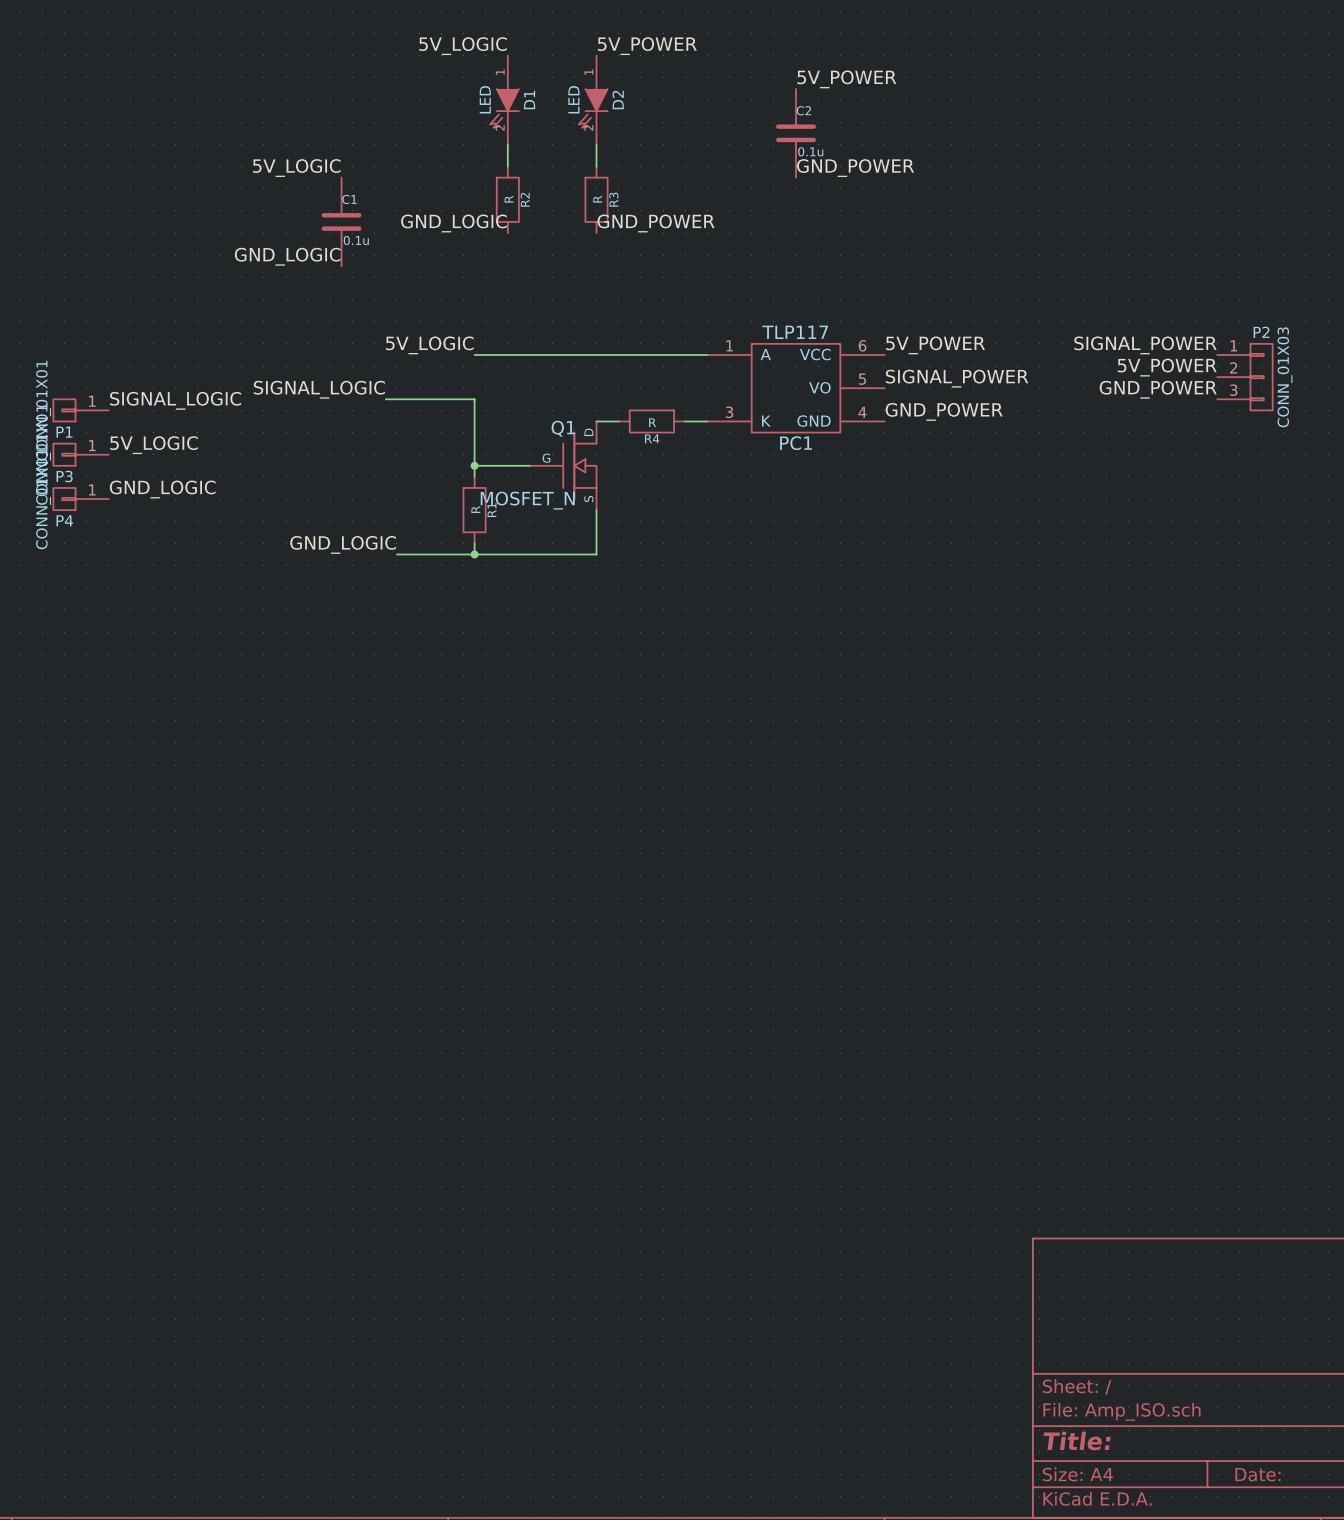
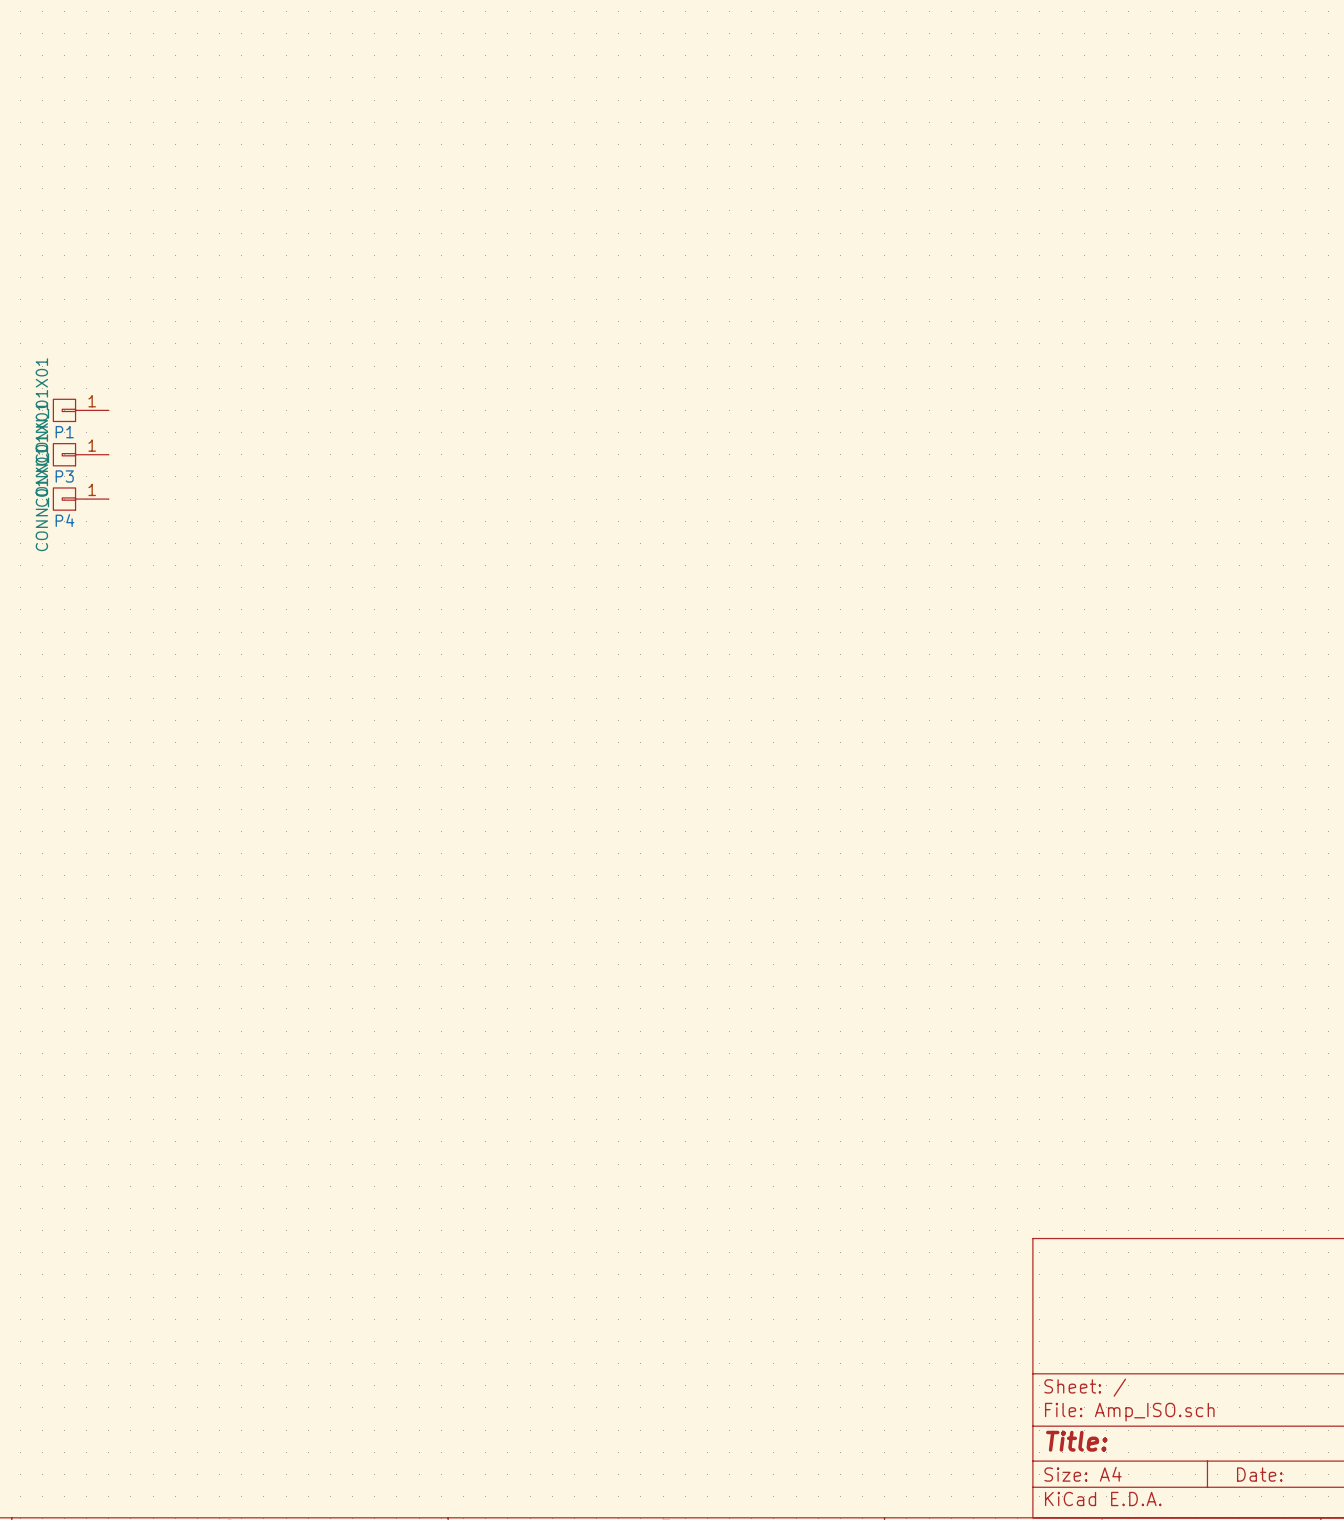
label: 5V_LOGIC (463, 46) -> none
label: 5V_POWER (647, 46) -> none
label: 5V_POWER (846, 79) -> none
D1: LED (504, 100) -> none
D2: LED (593, 100) -> none
C2: 0.1u (796, 133) -> none
wire: (507, 144) (507, 166) -> none
wire: (596, 144) (596, 166) -> none
label: 5V_LOGIC (296, 168) -> none
label: GND_POWER (855, 168) -> none
R2: R (507, 199) -> none
R3: R (596, 199) -> none
C1: 0.1u (341, 221) -> none
label: GND_LOGIC (453, 223) -> none
label: GND_POWER (656, 223) -> none
label: GND_LOGIC (287, 256) -> none
label: 5V_LOGIC (429, 345) -> none
label: 5V_POWER (935, 345) -> none
label: SIGNAL_POWER (1145, 345) -> none
wire: (474, 354) (707, 354) -> none
label: 5V_POWER (1167, 367) -> none
P2: CONN_01X03 (1244, 377) -> none
label: SIGNAL_POWER (957, 378) -> none
PC1: TLP117 (796, 388) -> none
label: SIGNAL_LOGIC (319, 389) -> none
label: GND_POWER (1158, 389) -> none
wire: (385, 399) (474, 399) (474, 476) -> none
label: SIGNAL_LOGIC (175, 400) -> none
label: GND_POWER (944, 411) -> none
wire: (596, 421) (618, 421) -> none
R4: R (651, 421) -> none
wire: (685, 421) (707, 421) -> none
label: 5V_LOGIC (154, 445) -> none
wire: (474, 465) (530, 465) -> none
junction: (474, 465) -> none
Q1: MOSFET_N (563, 465) -> none
label: GND_LOGIC (162, 489) -> none
R1: R (474, 510) -> none
wire: (596, 510) (596, 554) (396, 554) -> none
wire: (474, 543) (474, 554) -> none
label: GND_LOGIC (343, 544) -> none
junction: (474, 554) -> none

